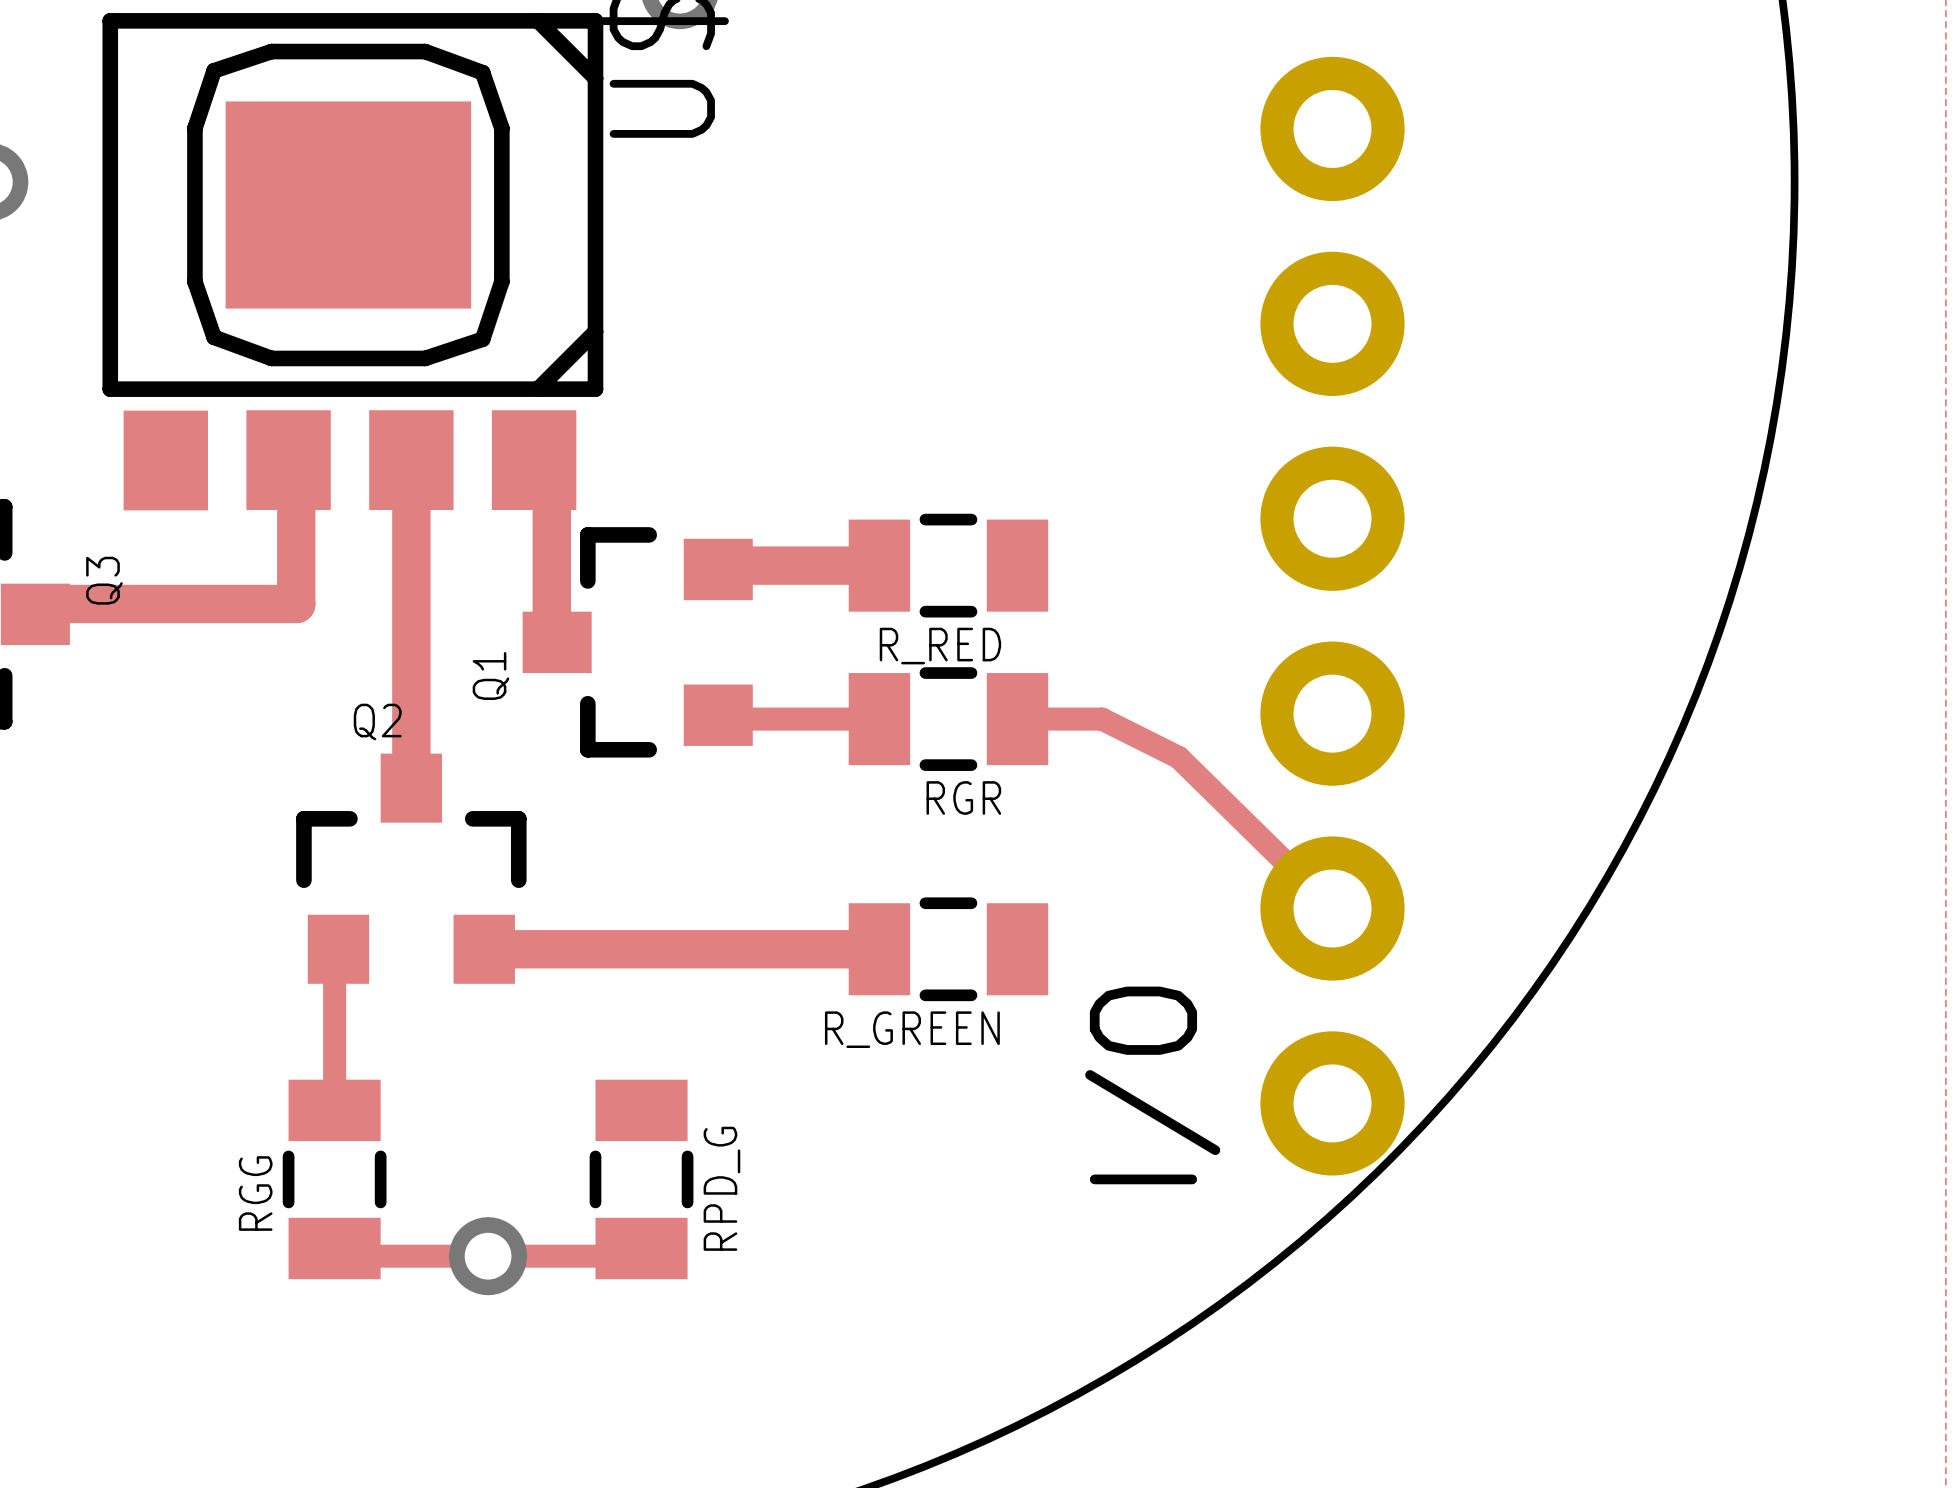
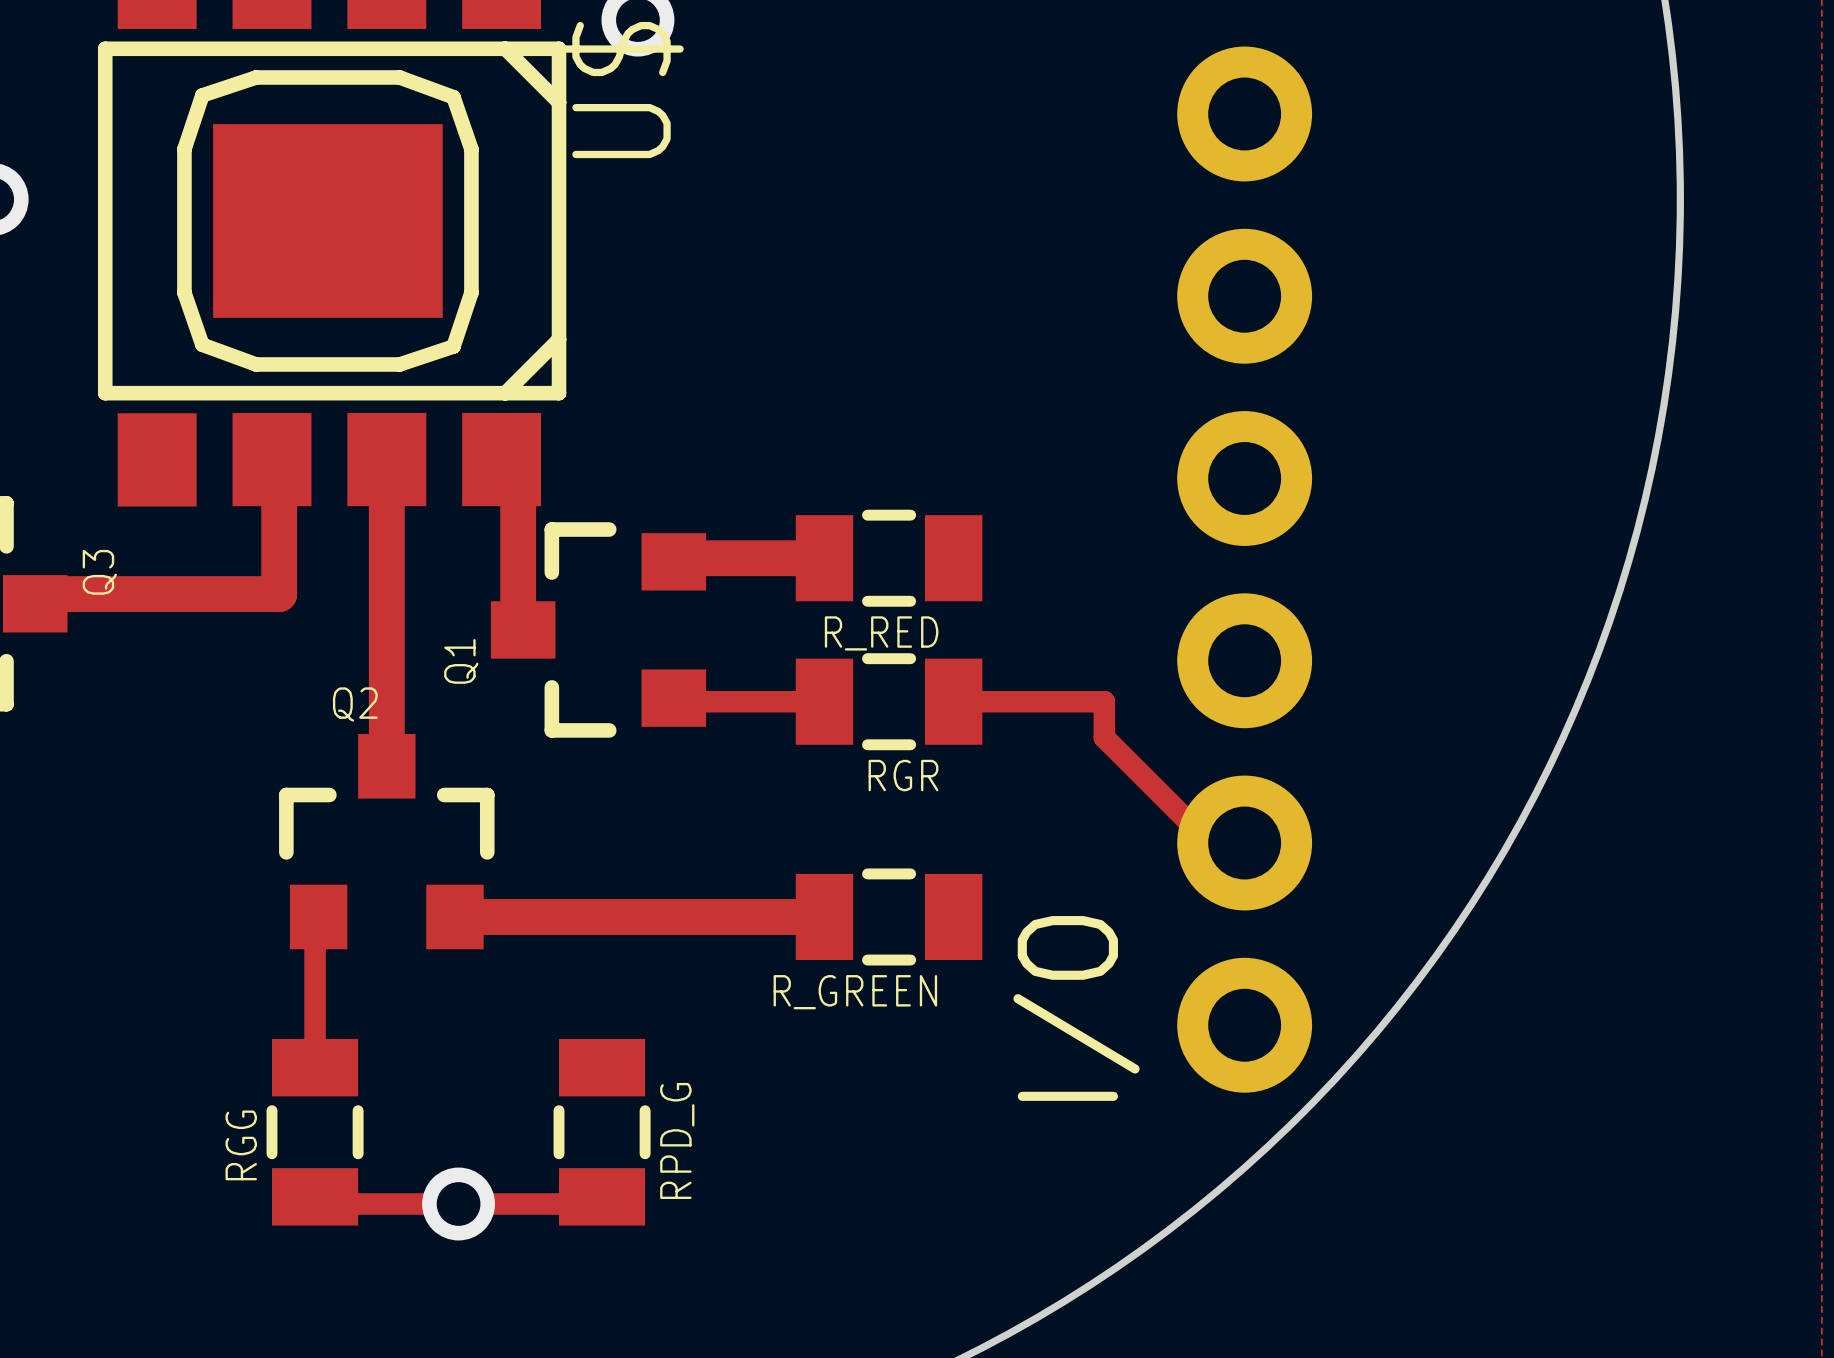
I/O position: (1332, 616) -> (1244, 569)
track: (1101, 719) (1178, 757) (1332, 908) -> (1032, 701) (1104, 701) (1104, 737) (1211, 845) (1244, 843)

